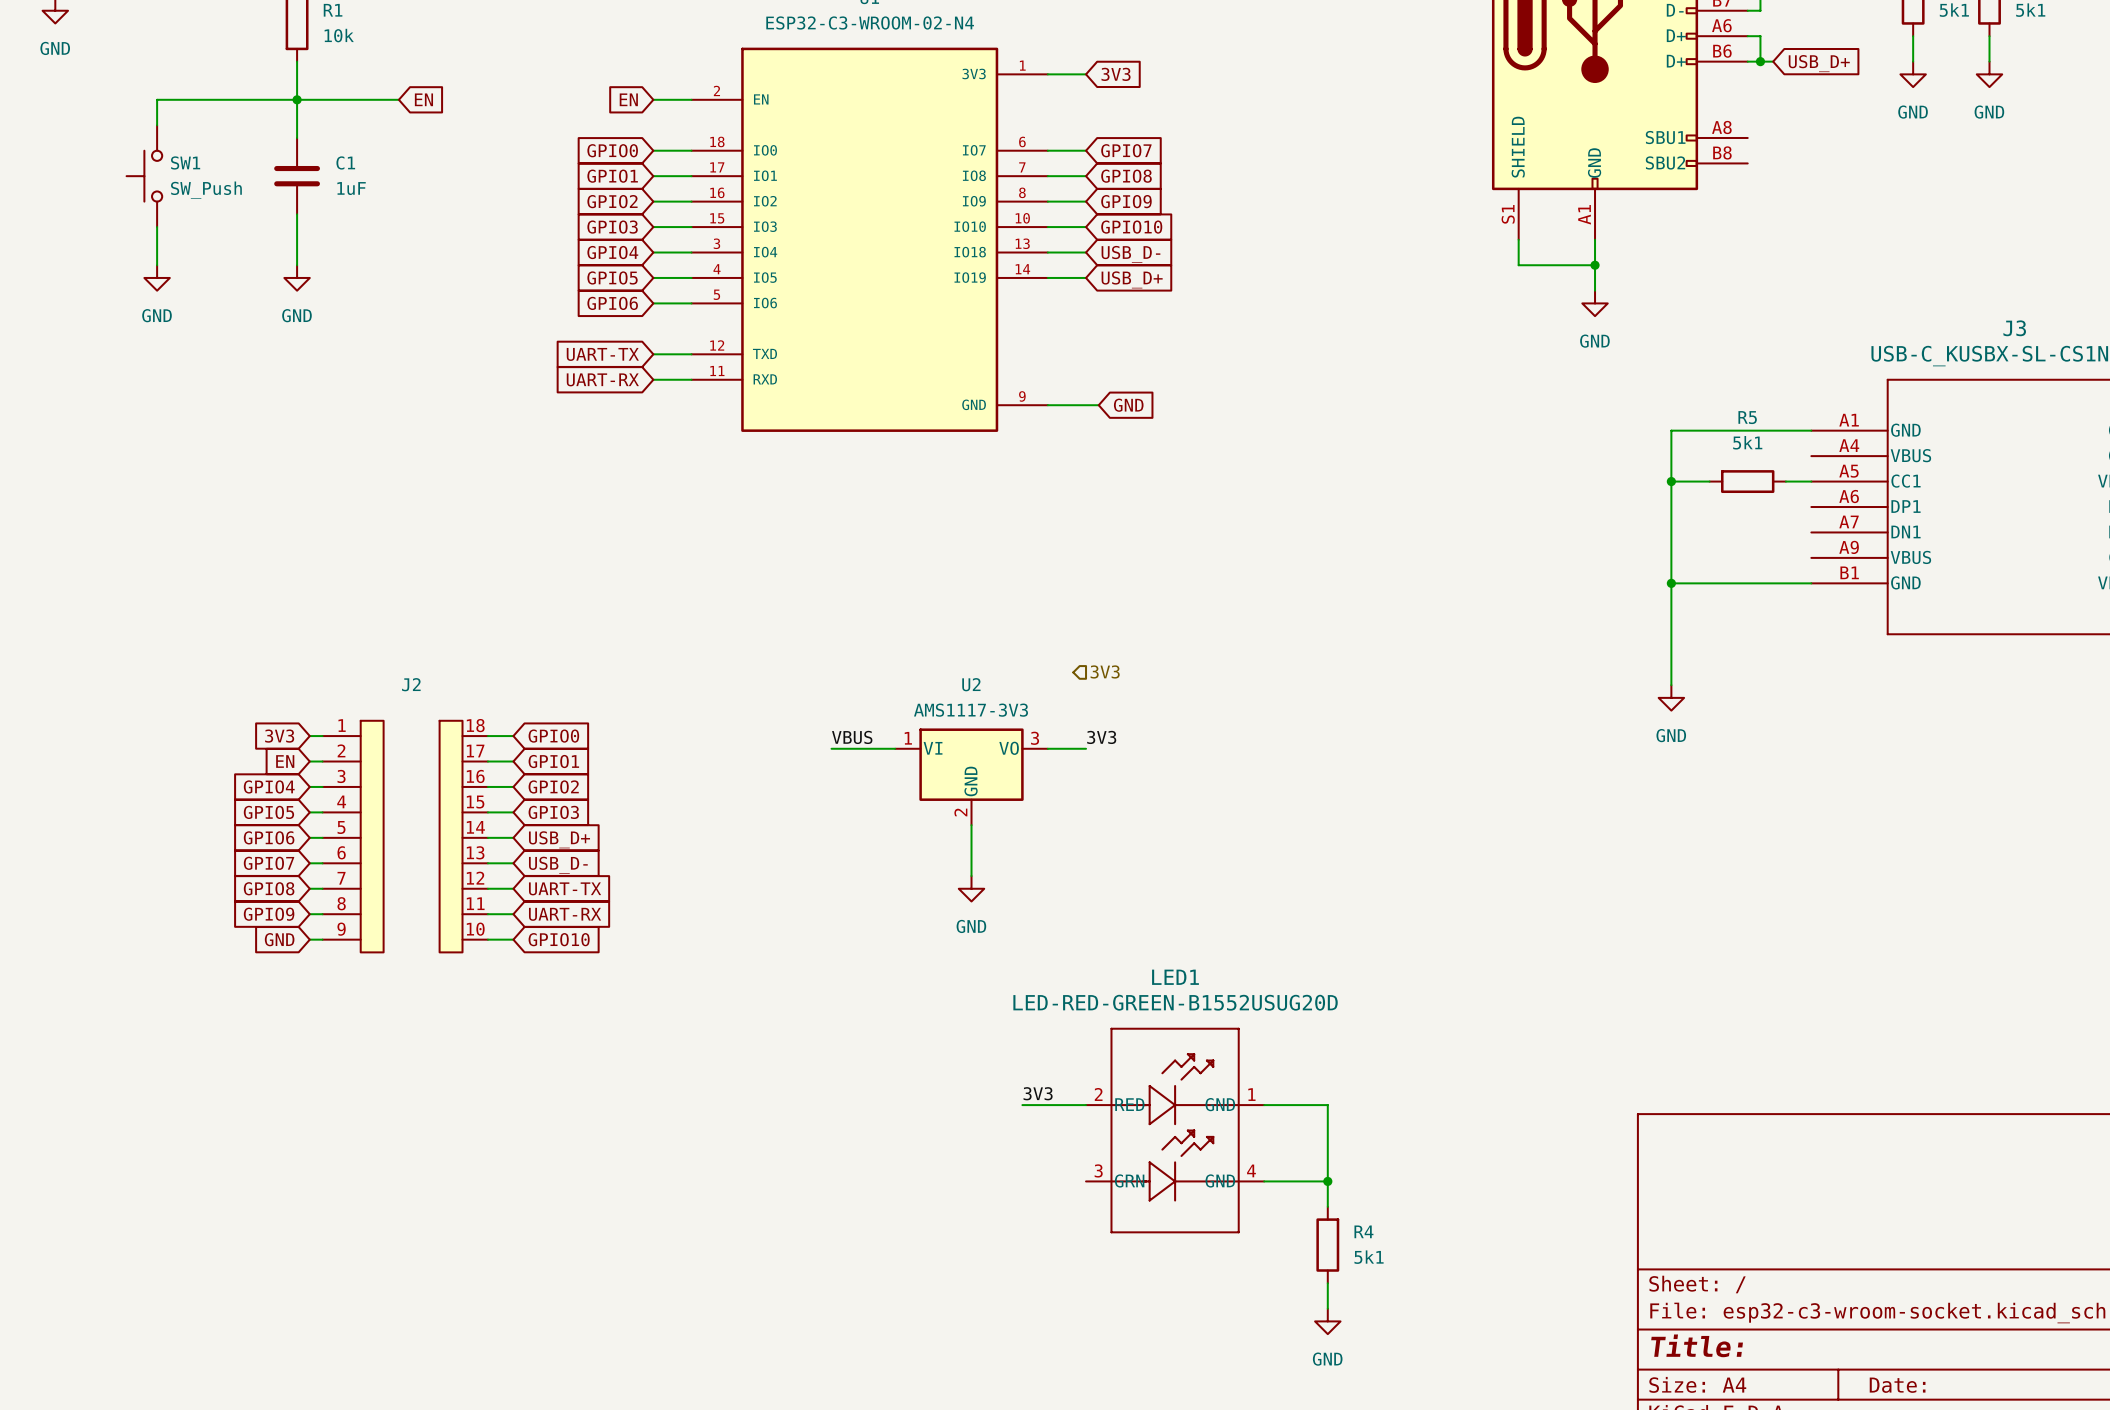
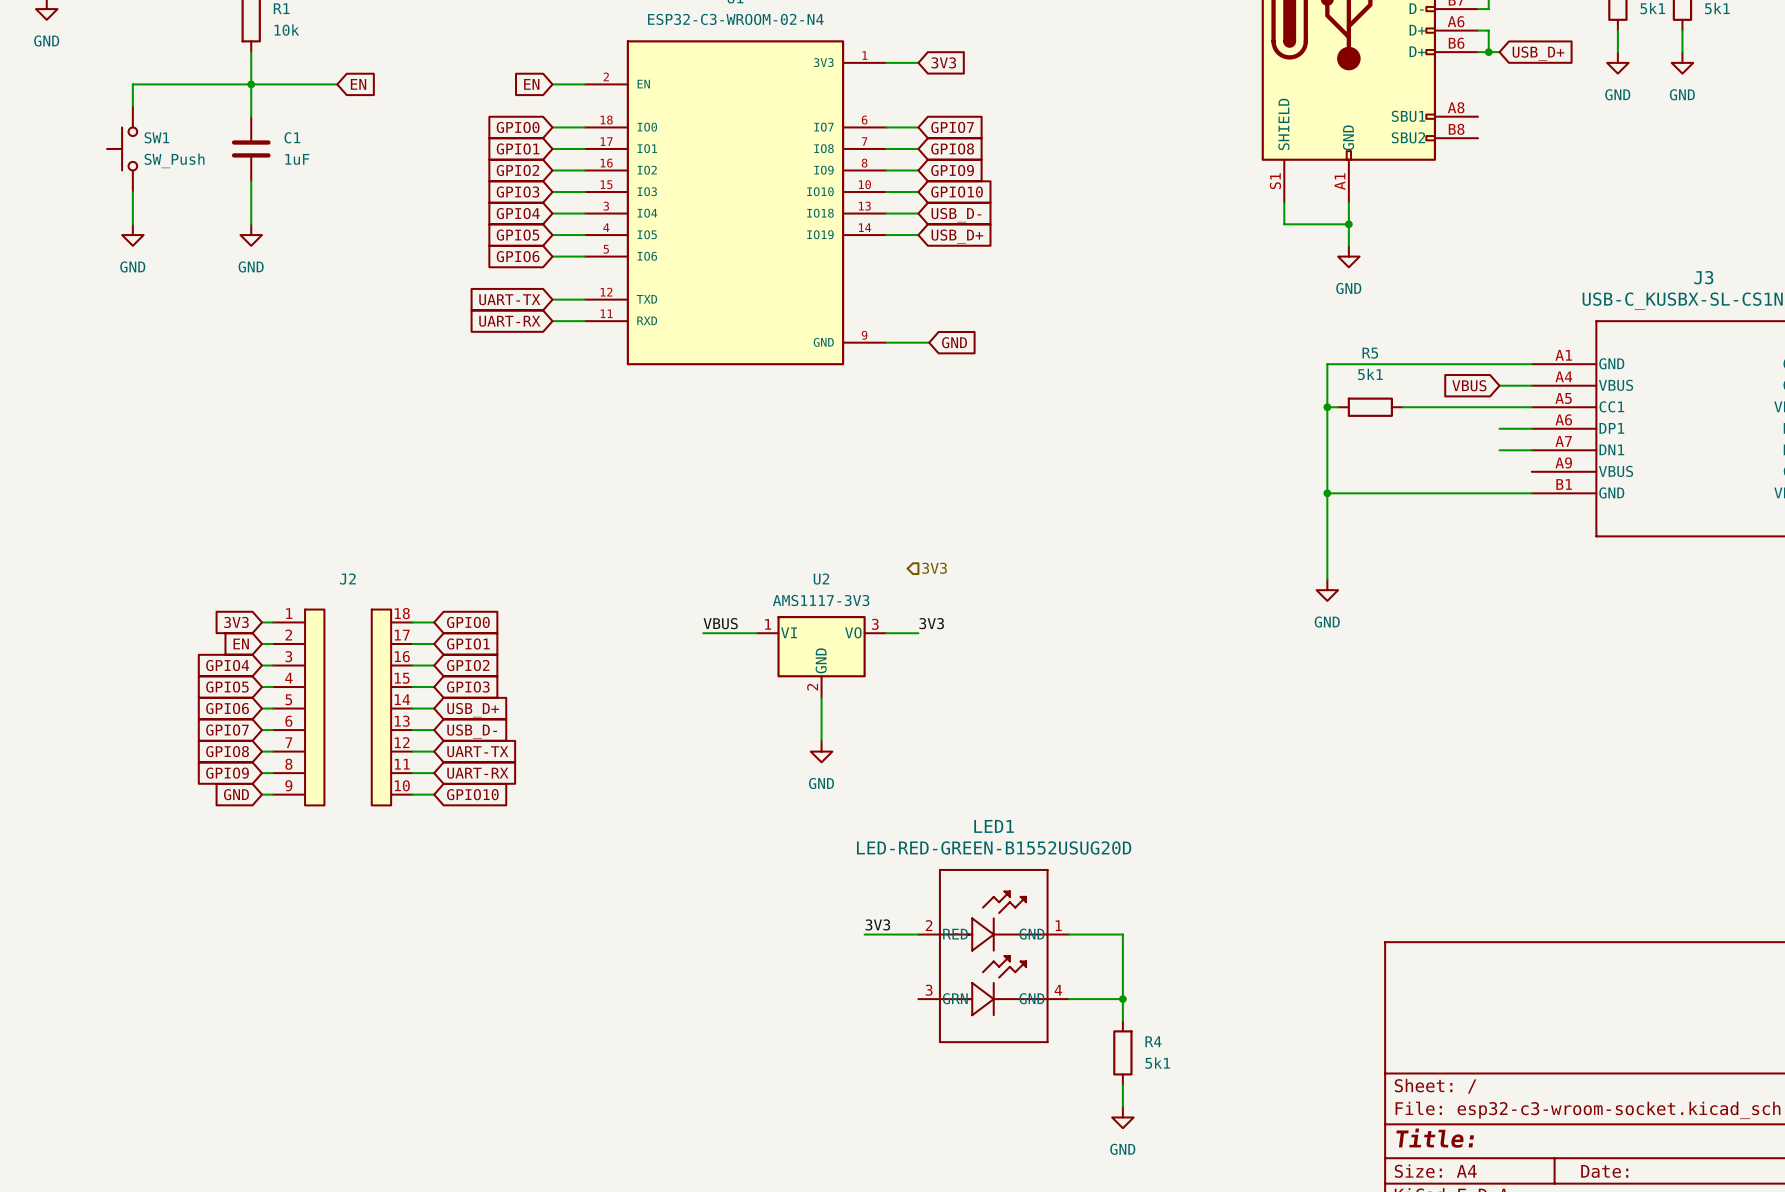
wire: (1671, 430) (1671, 685) -> (1413, 364) (1327, 364) (1327, 579)
global label: none -> VBUS (1469, 385)
wire: none -> (1499, 385) (1531, 385)
wire: none -> (1327, 407) (1338, 407)
junction: none -> (1327, 407)
wire: none -> (1402, 407) (1413, 407)
junction: (1671, 481) -> none
wire: none -> (1445, 407) (1510, 407)
R5 position: (1747, 481) -> (1370, 407)
wire: none -> (1499, 428) (1531, 428)
wire: none -> (1499, 450) (1531, 450)
wire: none -> (1327, 493) (1413, 493)
junction: none -> (1327, 493)
junction: (1671, 583) -> none
power symbol position: GND (1671, 697) -> GND (1327, 590)

